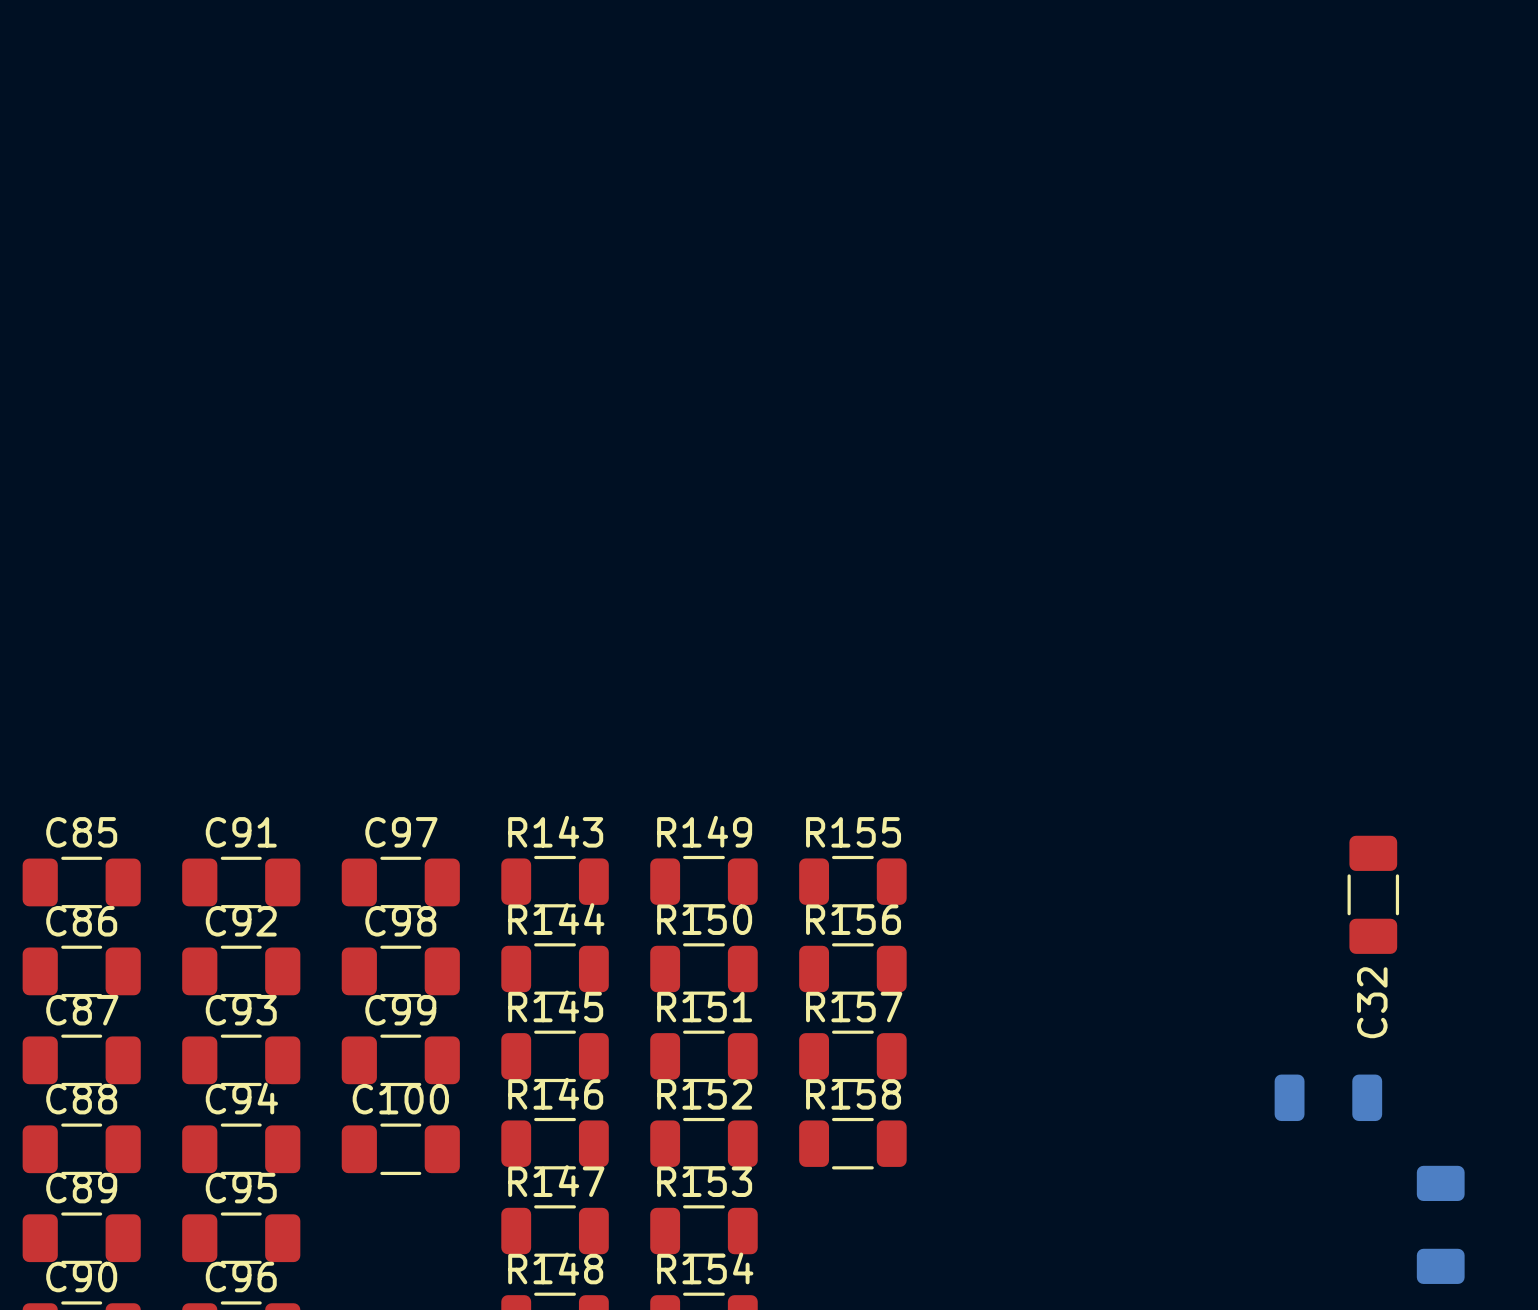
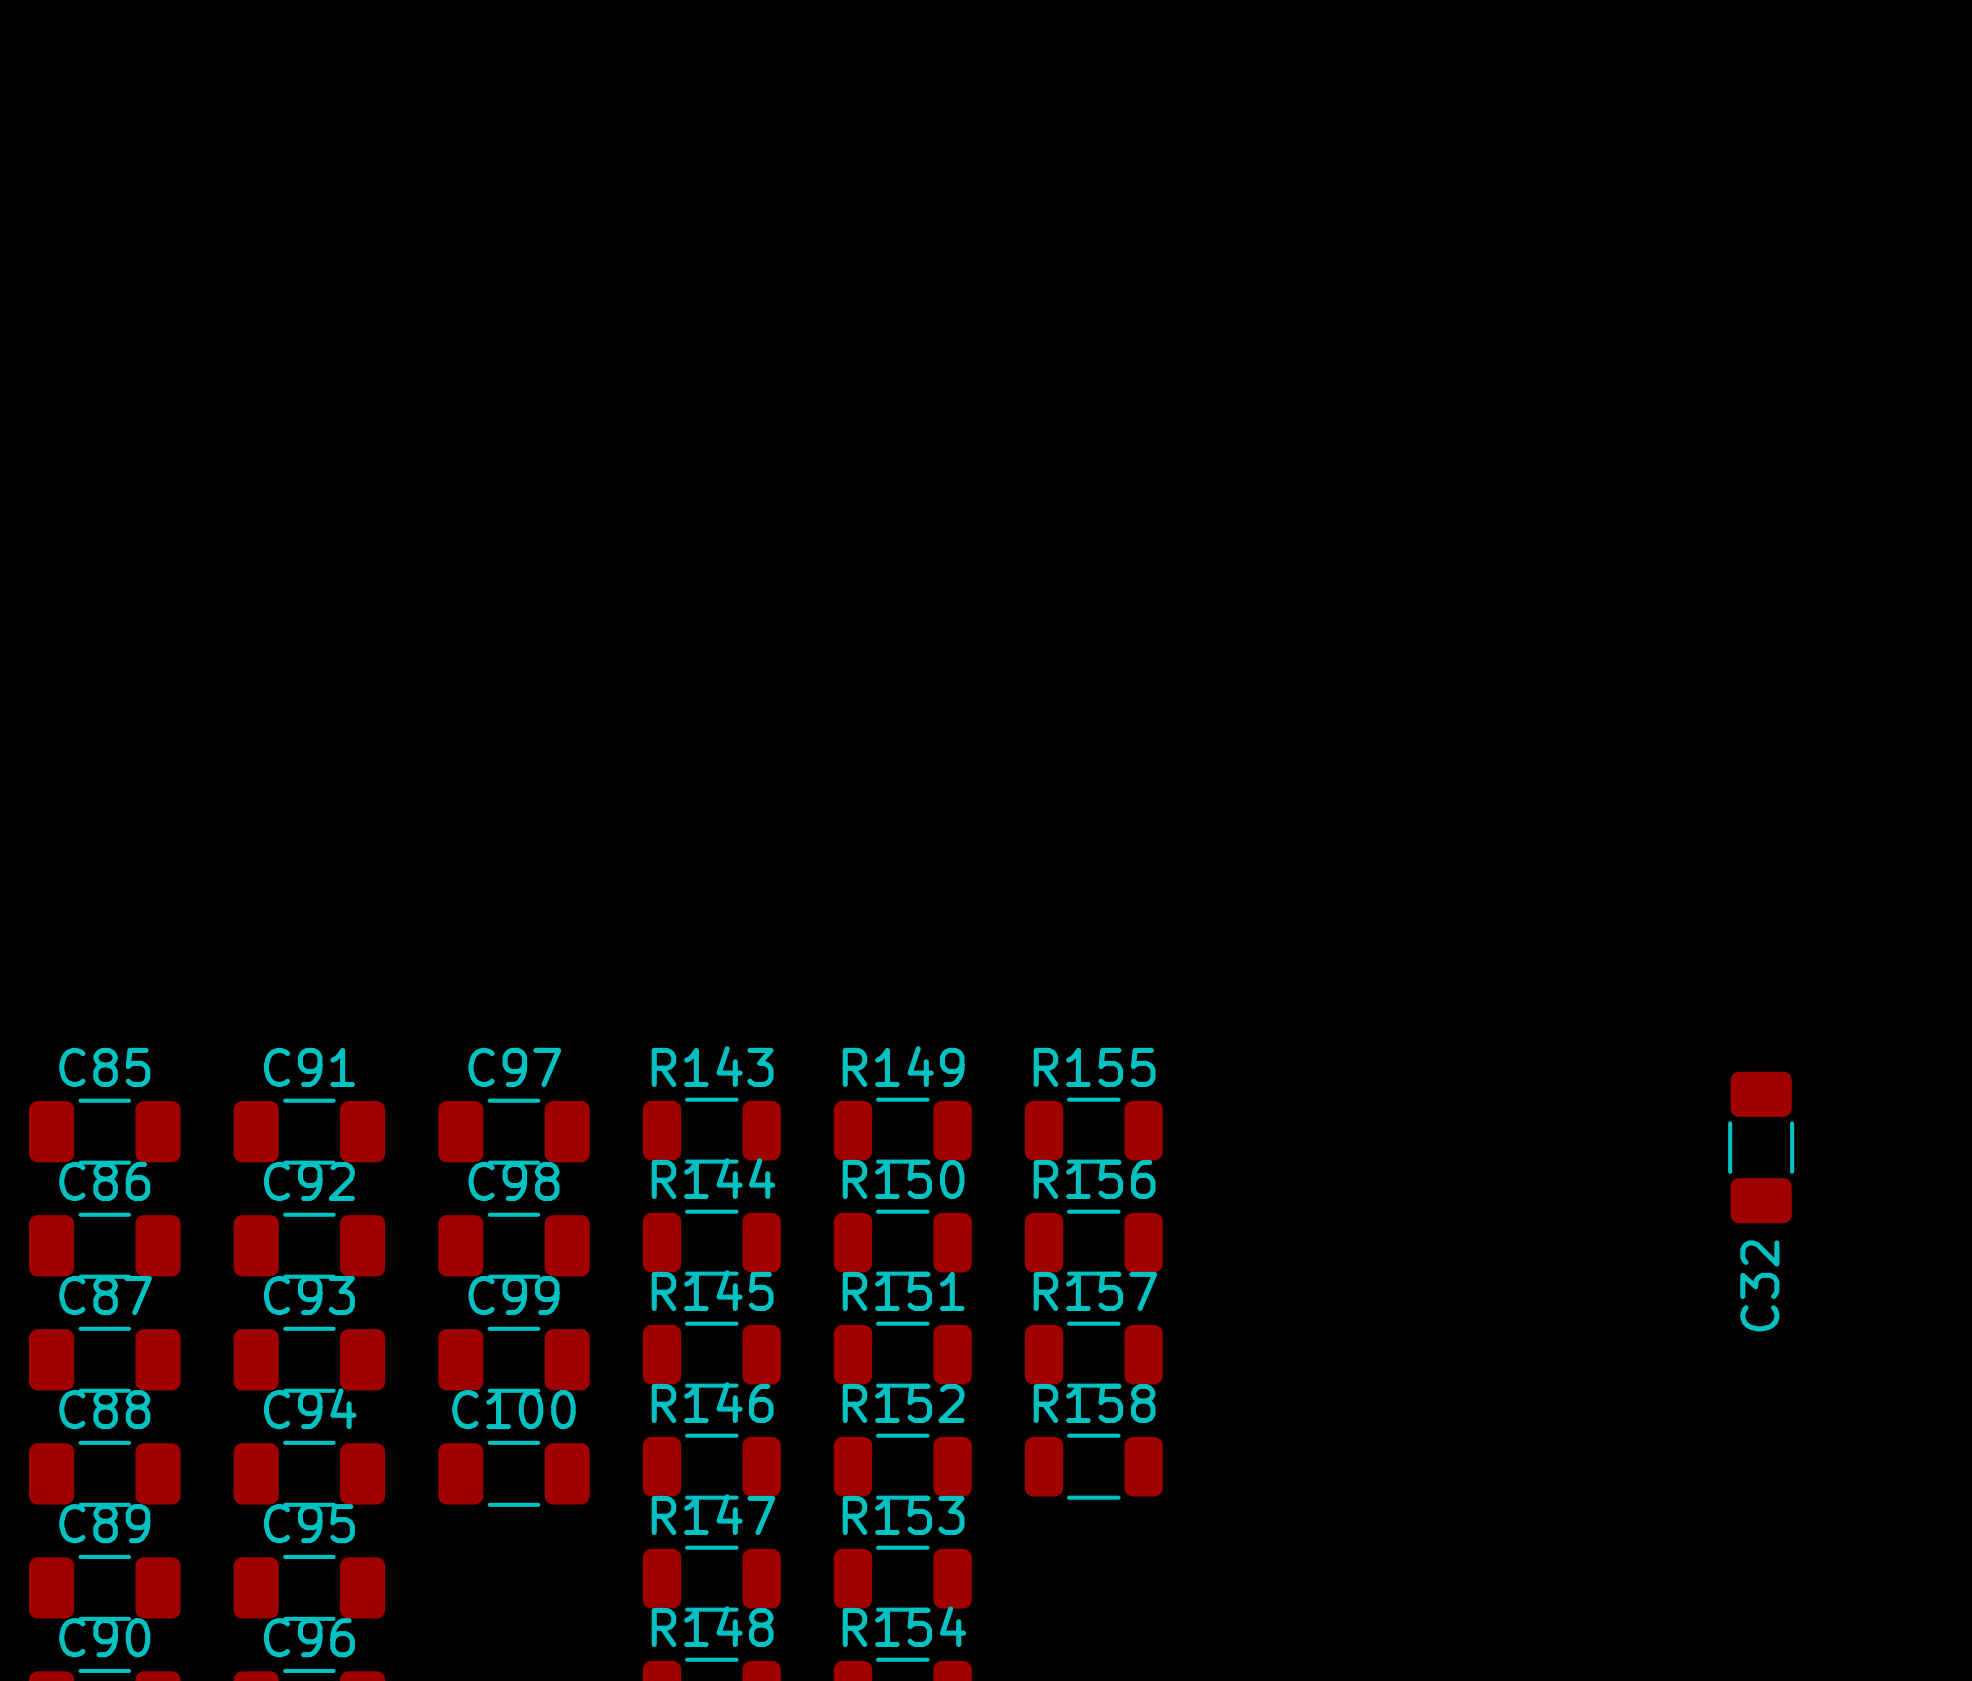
part: (1328, 1097) -> none
part: (1440, 1224) -> none

